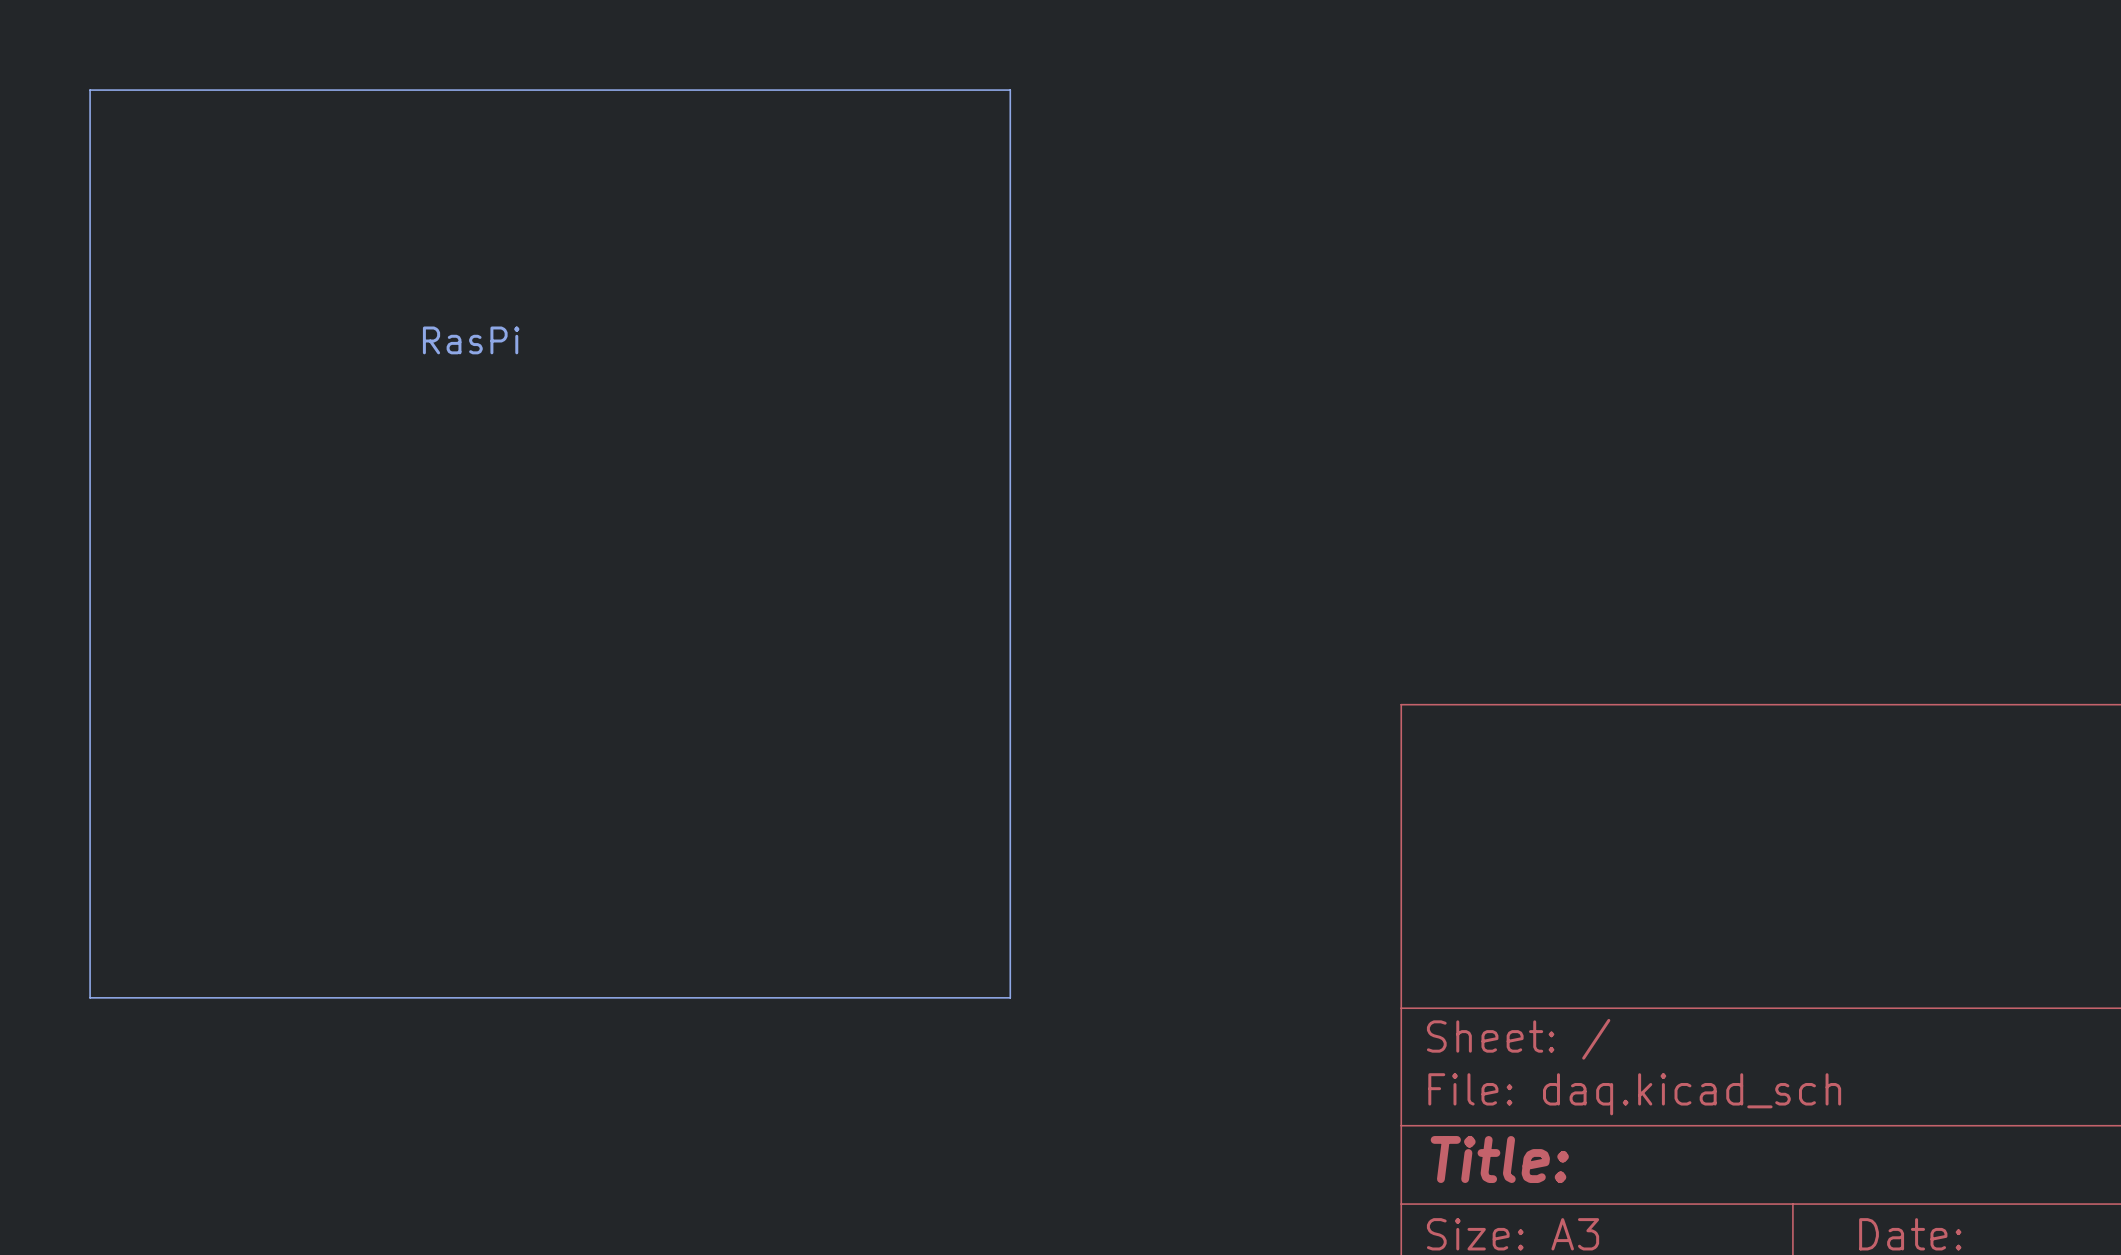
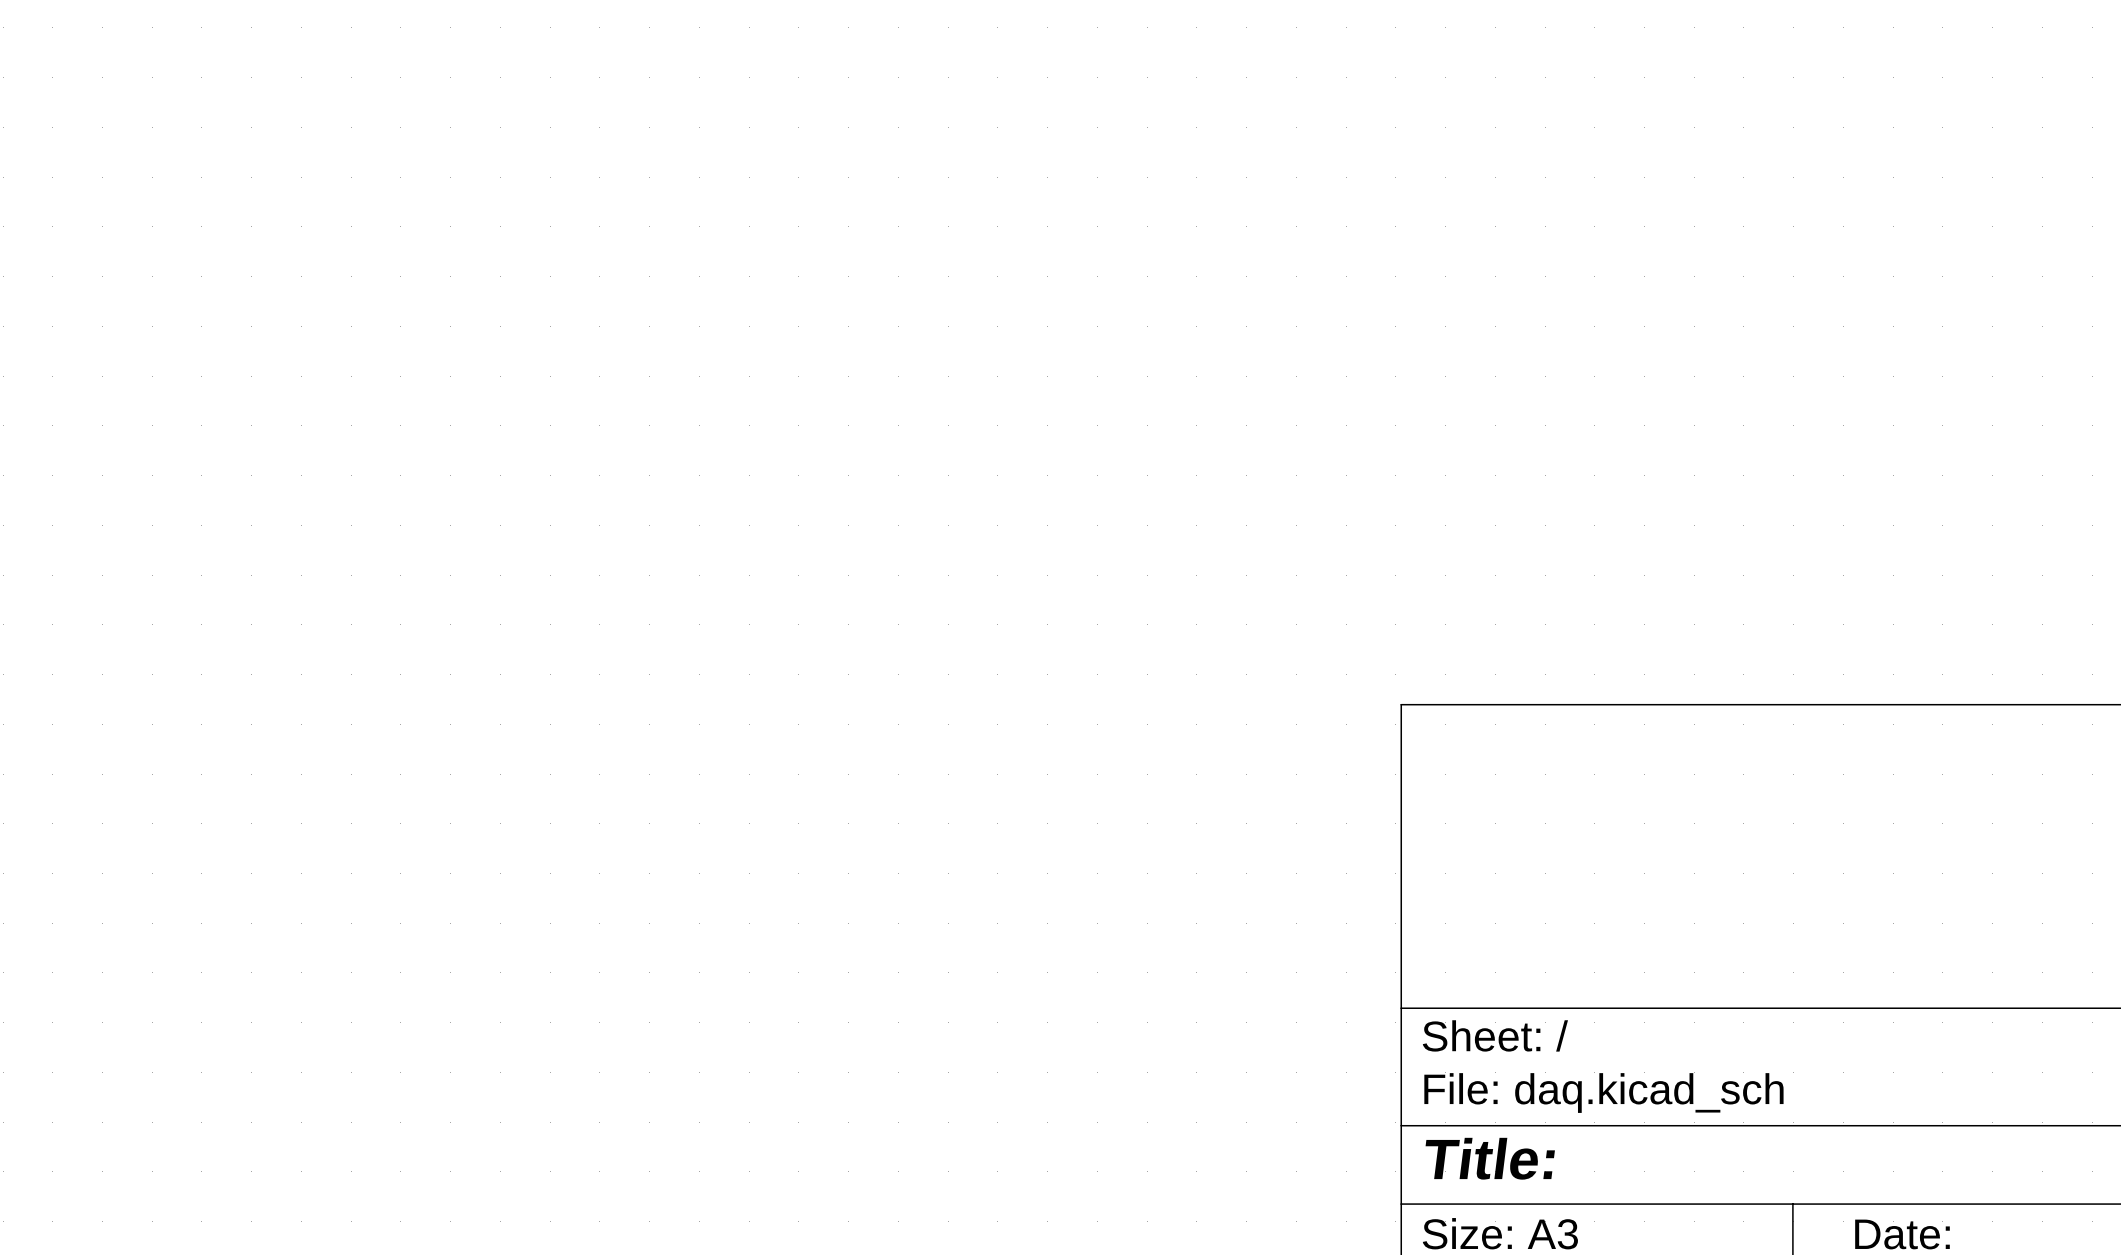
line: (90, 90) (1010, 90) (1010, 997) (90, 997) (90, 90) -> none
text: RasPi (471, 340) -> none

